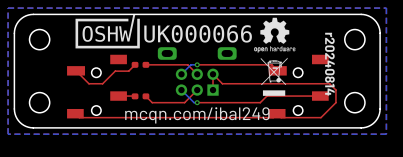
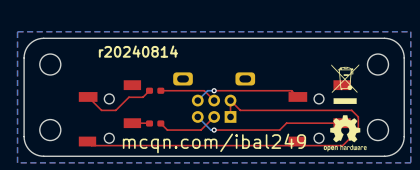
drawing: [75, 14, 252, 49] -> none
text: none -> r20240814 (138, 51)
drawing position: (274, 35) -> (345, 133)
text: r20240814 (329, 64) -> none
drawing position: (274, 76) -> (345, 84)

